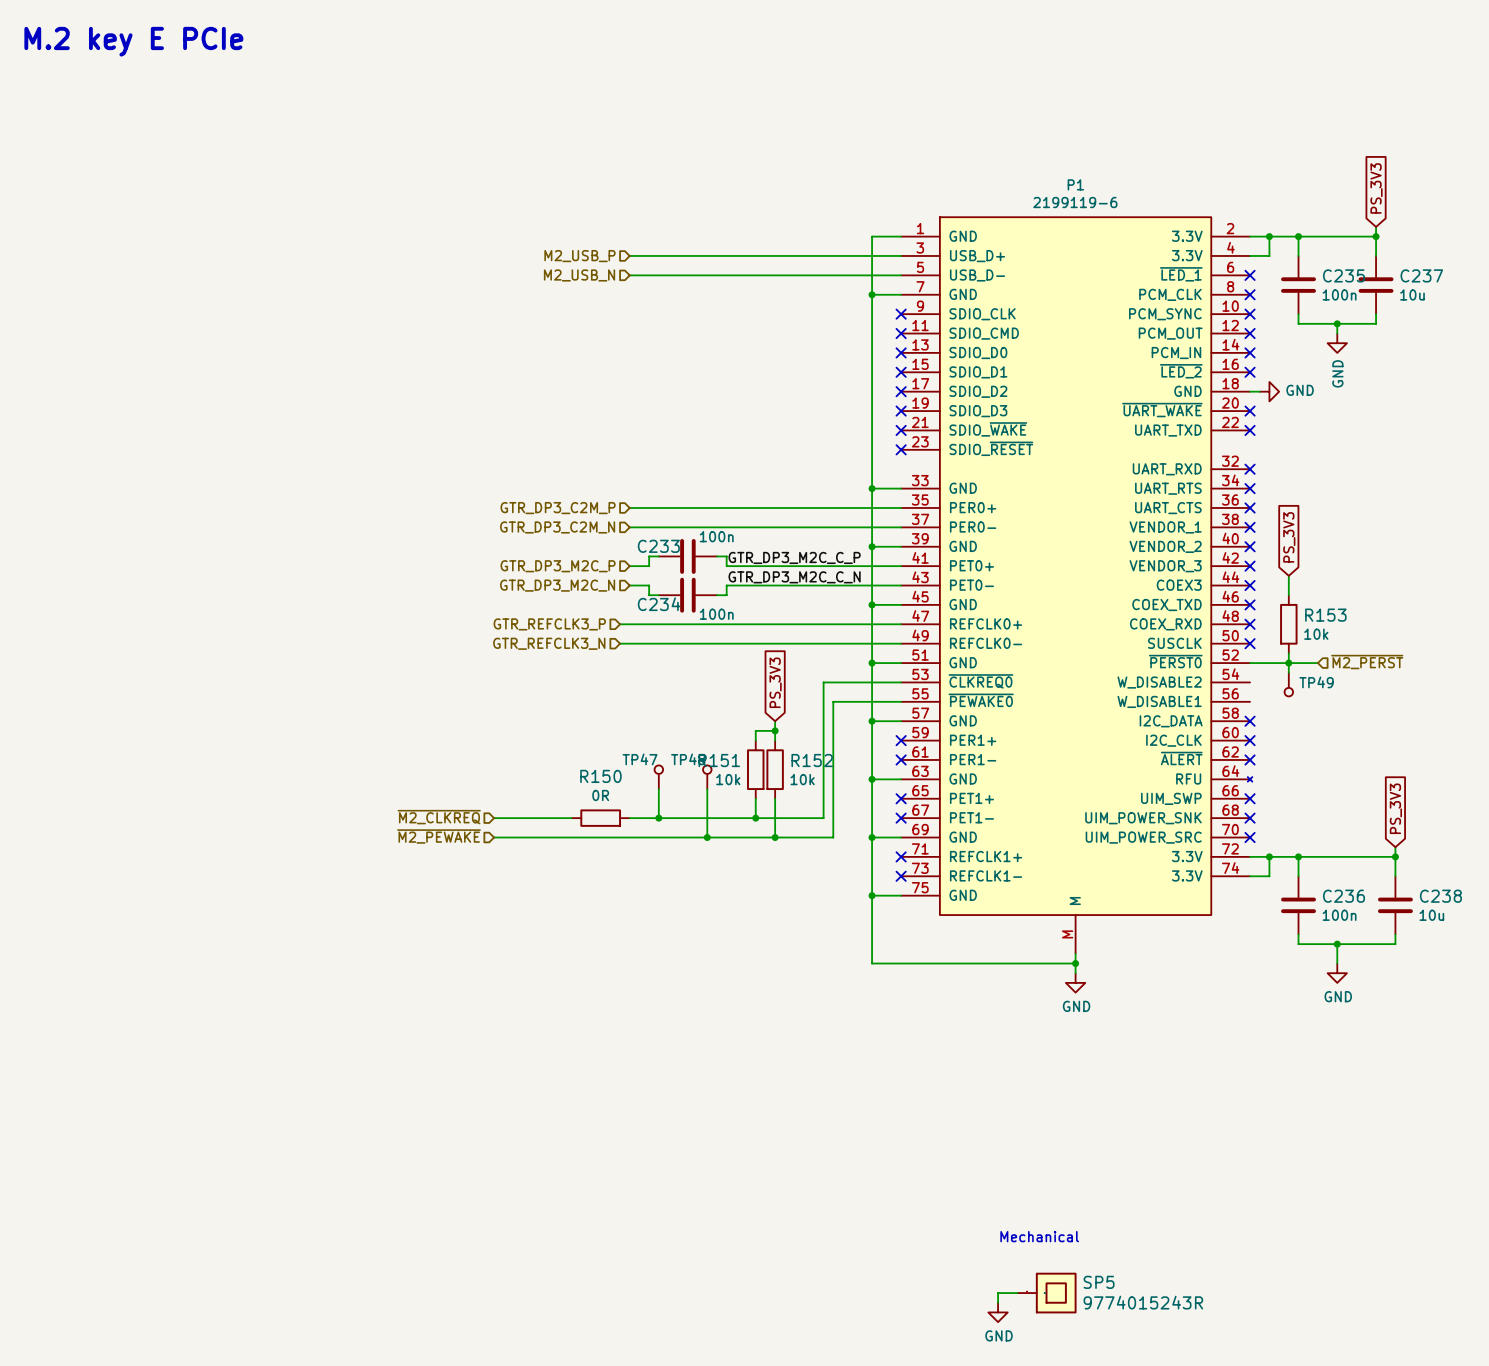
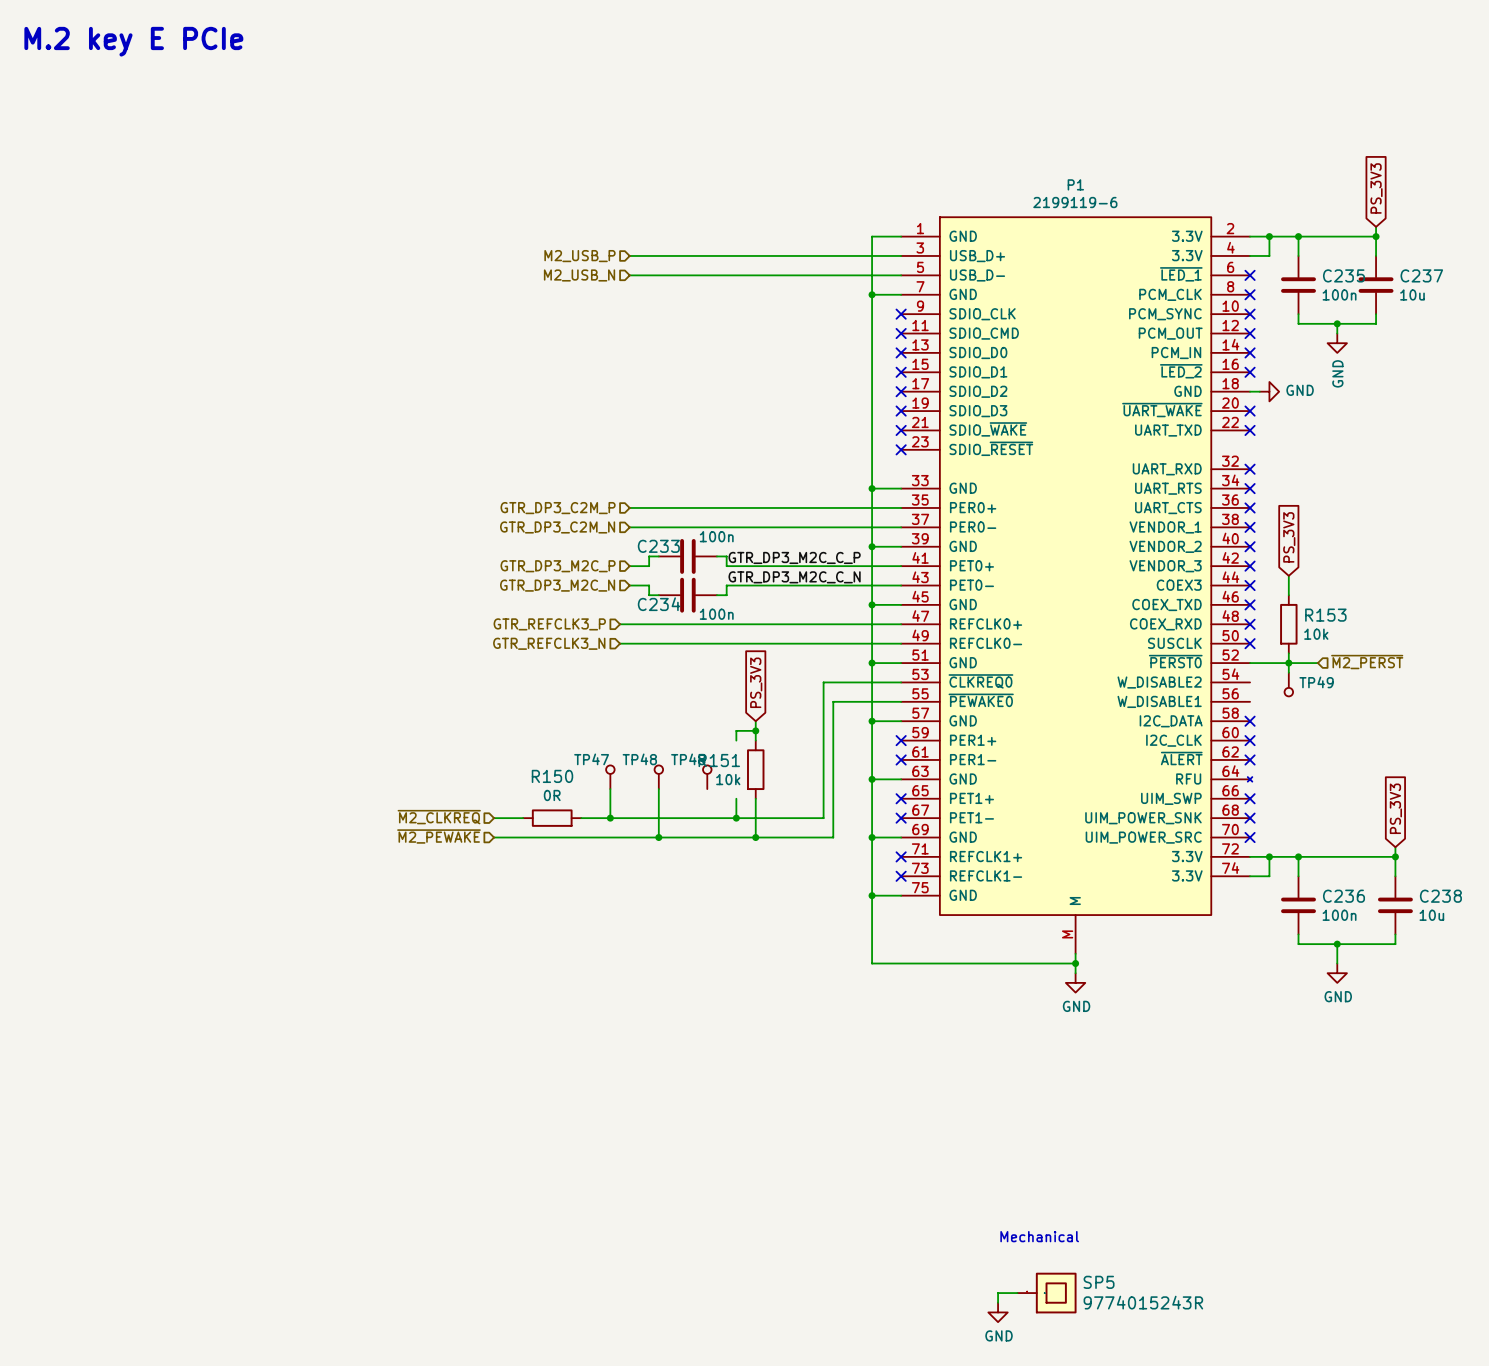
global label position: PS_3V3 (775, 682) -> PS_3V3 (756, 682)
wire: none -> (755, 721) (755, 730) (736, 730) (736, 740)
wire: (775, 721) (775, 740) -> (736, 798) (736, 818)
wire: (755, 730) (775, 730) -> none
junction position: (775, 730) -> (755, 730)
TP47 name: TP47 (640, 759) -> TP48 (639, 759)
R152: (775, 769) -> none
TP47: none -> (610, 777)
wire: none -> (610, 789) (610, 818)
wire: (707, 789) (707, 837) -> none
wire: (775, 798) (775, 837) -> none
wire: (523, 818) (571, 818) -> (581, 818) (629, 818)
R150 position: (600, 818) -> (552, 818)
junction: none -> (610, 818)
wire: none -> (658, 818) (658, 837)
junction position: (658, 818) -> (658, 837)
junction: none -> (736, 818)
wire: none -> (755, 818) (755, 837)
junction: (755, 818) -> none
junction: (707, 837) -> none
junction: none -> (755, 837)
junction: (775, 837) -> none

